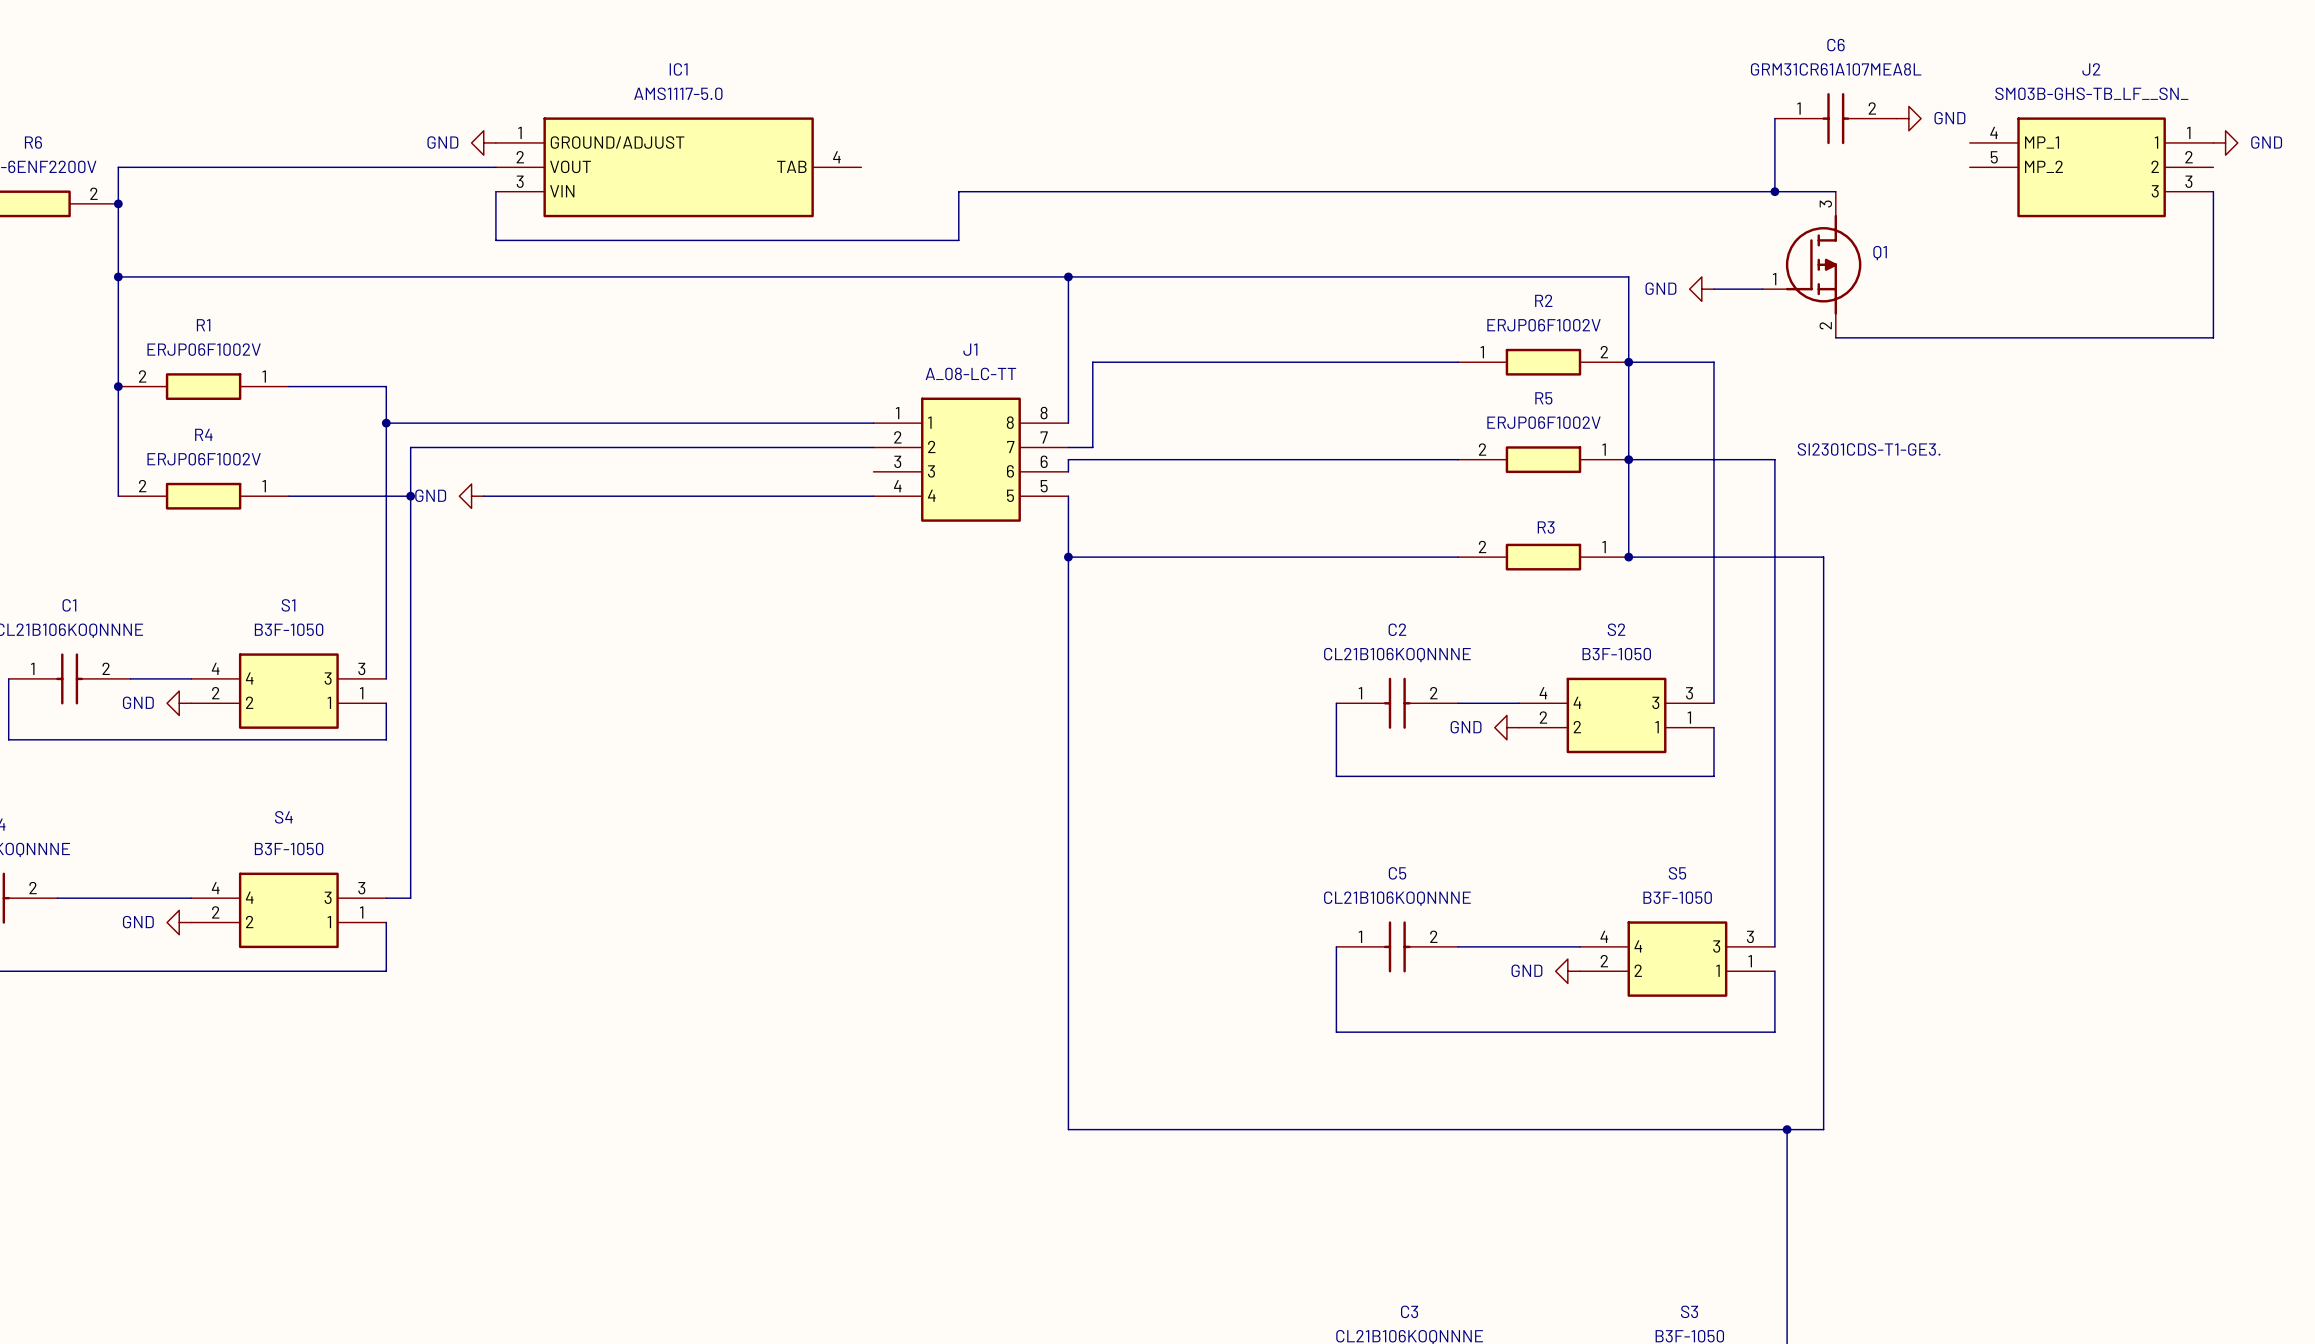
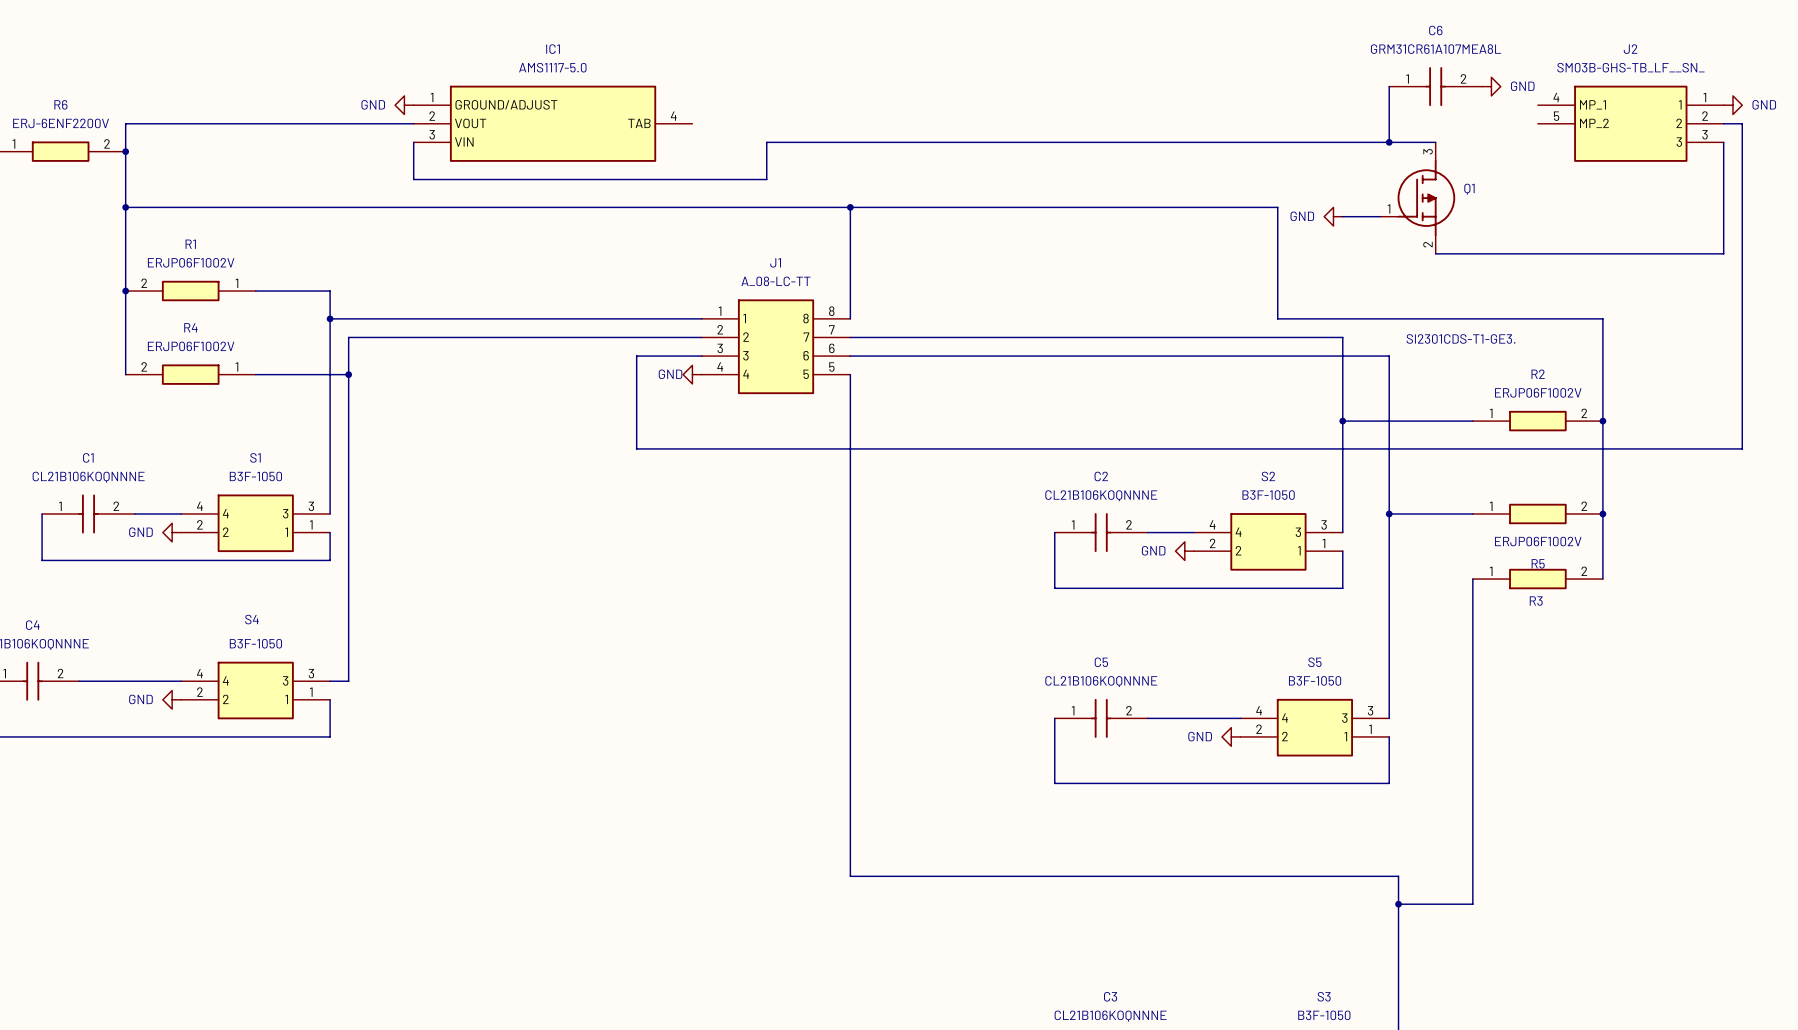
wire: none -> (1723, 123) (1742, 123) (1742, 448) (636, 448) (636, 356) (701, 356)
wire: (1458, 362) (1092, 362) (1092, 447) -> (1342, 337) (868, 337)
R2 position: (1543, 362) -> (1537, 421)
wire: (1628, 362) (1714, 362) (1714, 447) -> none
junction: (1628, 362) -> none
wire: (1628, 423) (1628, 557) (1714, 557) -> (1277, 318) (1602, 318) (1602, 579)
wire: (1458, 459) (1068, 459) (1068, 471) -> (1389, 356) (850, 356)
R5 rotation: 0° (1543, 459) -> 180° (1537, 513)
R5 position: (1543, 459) -> (1537, 513)
wire: (1628, 459) (1774, 459) (1774, 471) -> none
junction: (1628, 459) -> none
power symbol: GND (471, 496) -> none
wire: (483, 496) (873, 496) -> none
power symbol: none -> GND (692, 374)
wire: (1068, 557) (1458, 557) -> none
junction: (1068, 557) -> none
R3 rotation: 0° (1543, 557) -> 180° (1537, 579)
R3 position: (1543, 557) -> (1537, 579)
junction: (1628, 557) -> none
junction: none -> (1342, 421)
wire: (1823, 557) (1823, 1129) (1068, 1129) -> (1398, 876) (850, 876) (850, 857)
wire: none -> (1426, 421) (1472, 421)
junction: none -> (1602, 421)
wire: none -> (1389, 513) (1472, 513)
junction: none -> (1389, 513)
junction: none -> (1602, 513)
wire: none -> (1472, 579) (1472, 904) (1398, 904)
wire: (1787, 1129) (1787, 1153) -> none
junction: (1787, 1129) -> none
junction: none -> (1398, 904)

